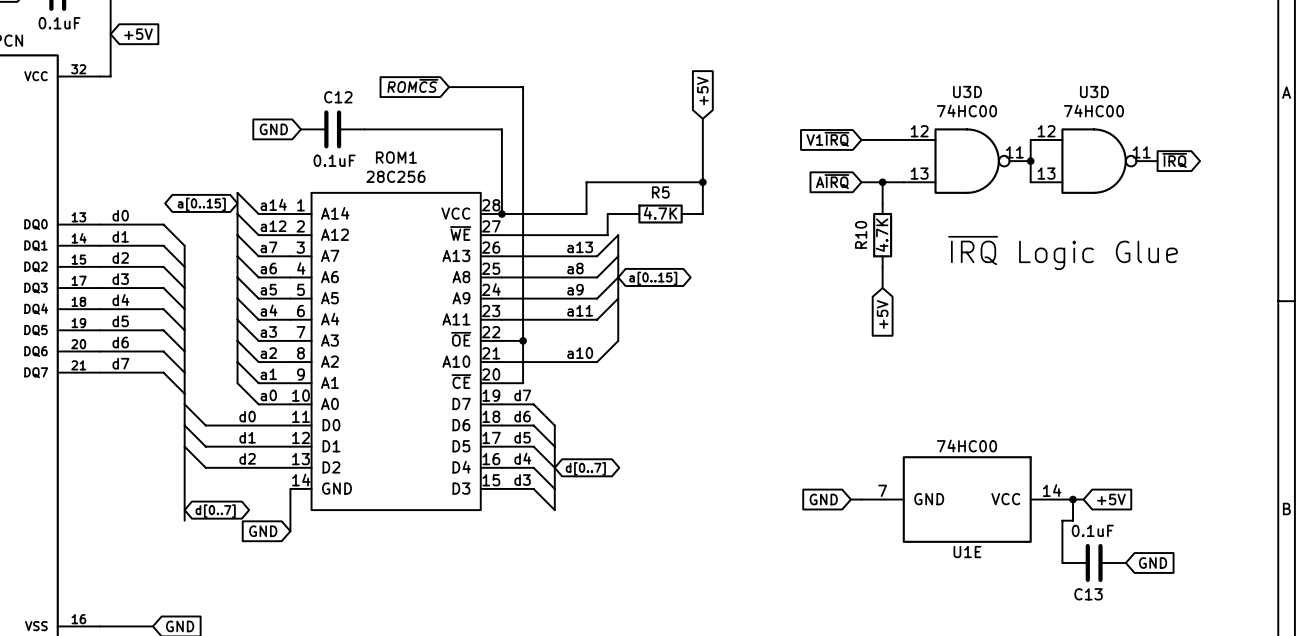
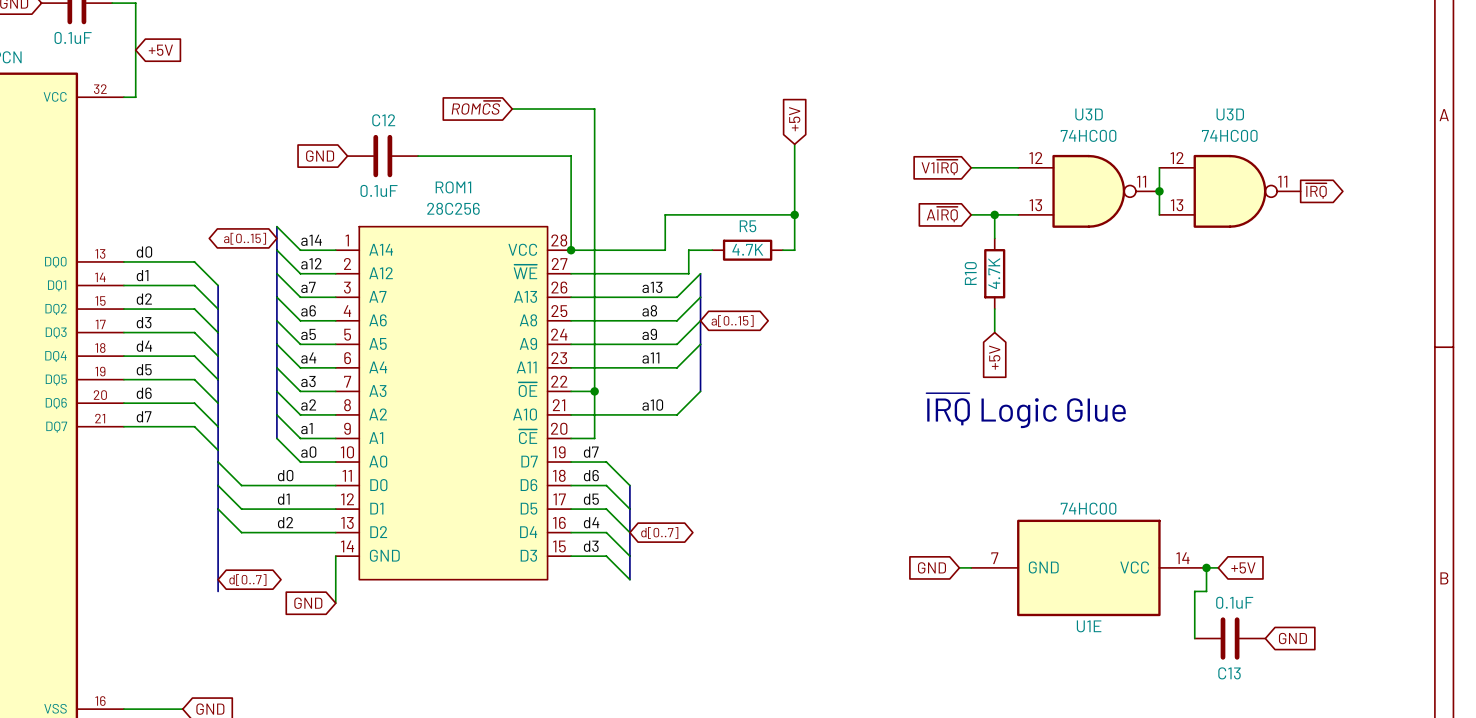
text position: ~{IRQ} Logic Glue (1062, 252) -> ~{IRQ} Logic Glue (1026, 410)

